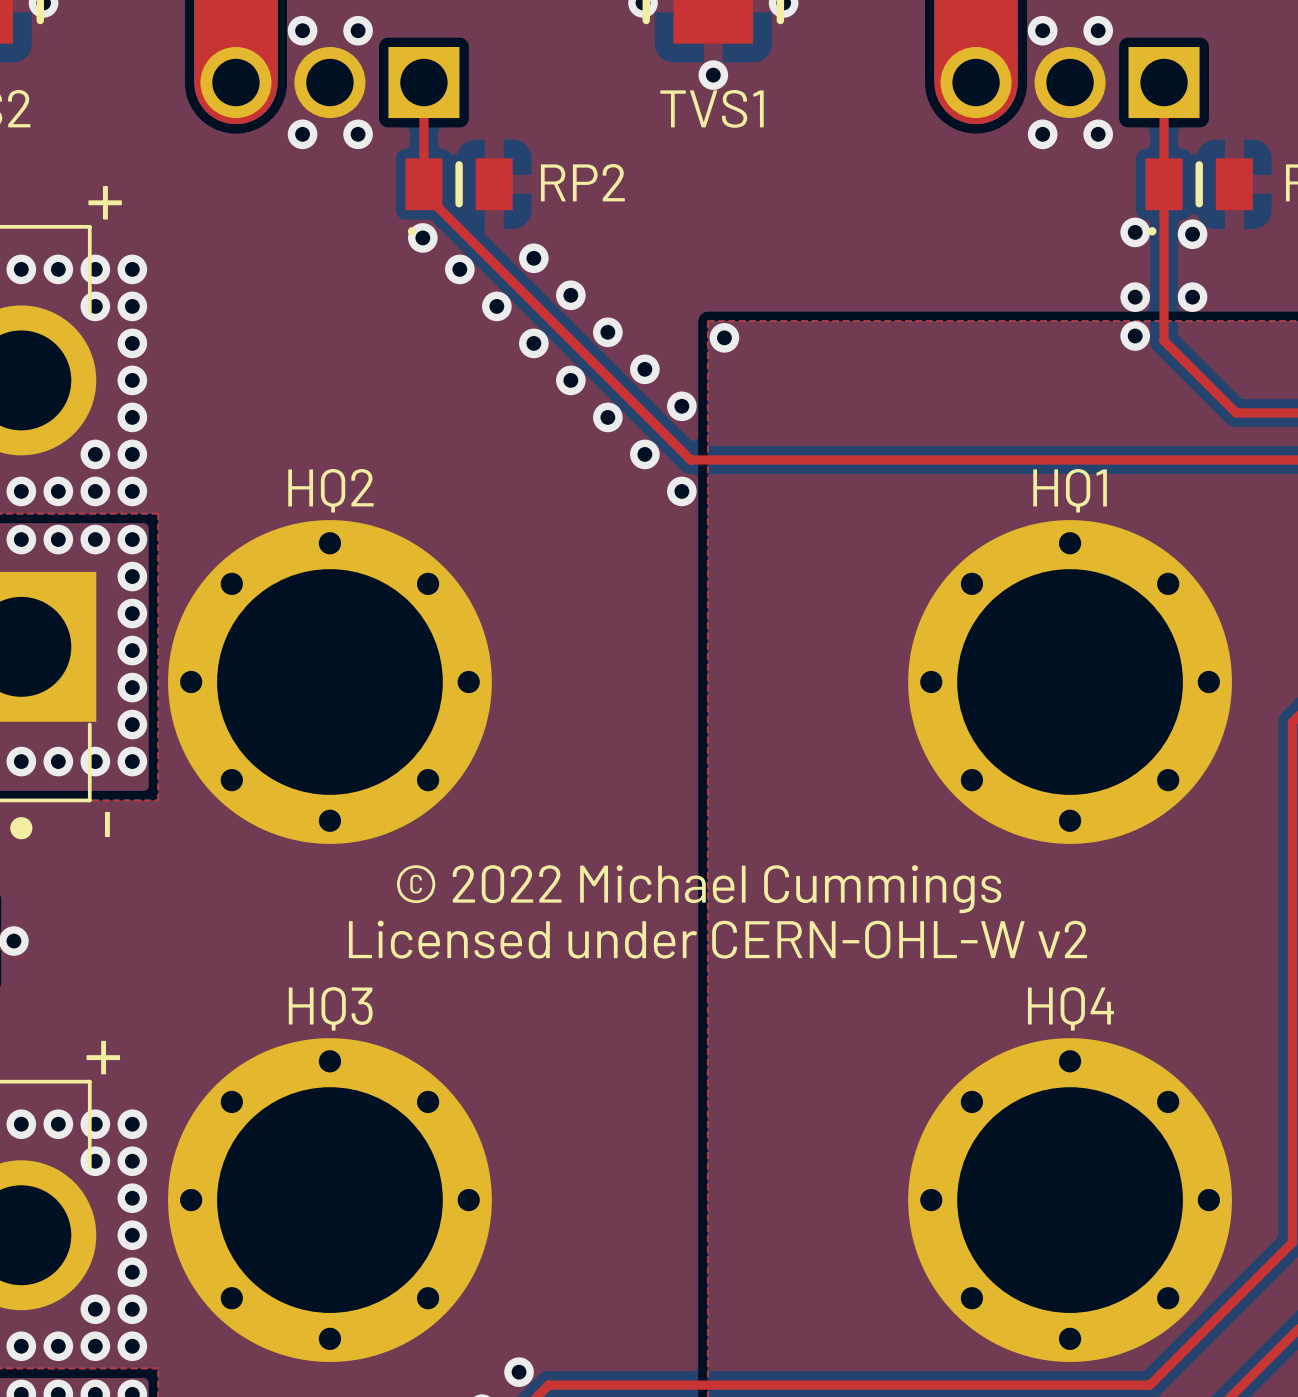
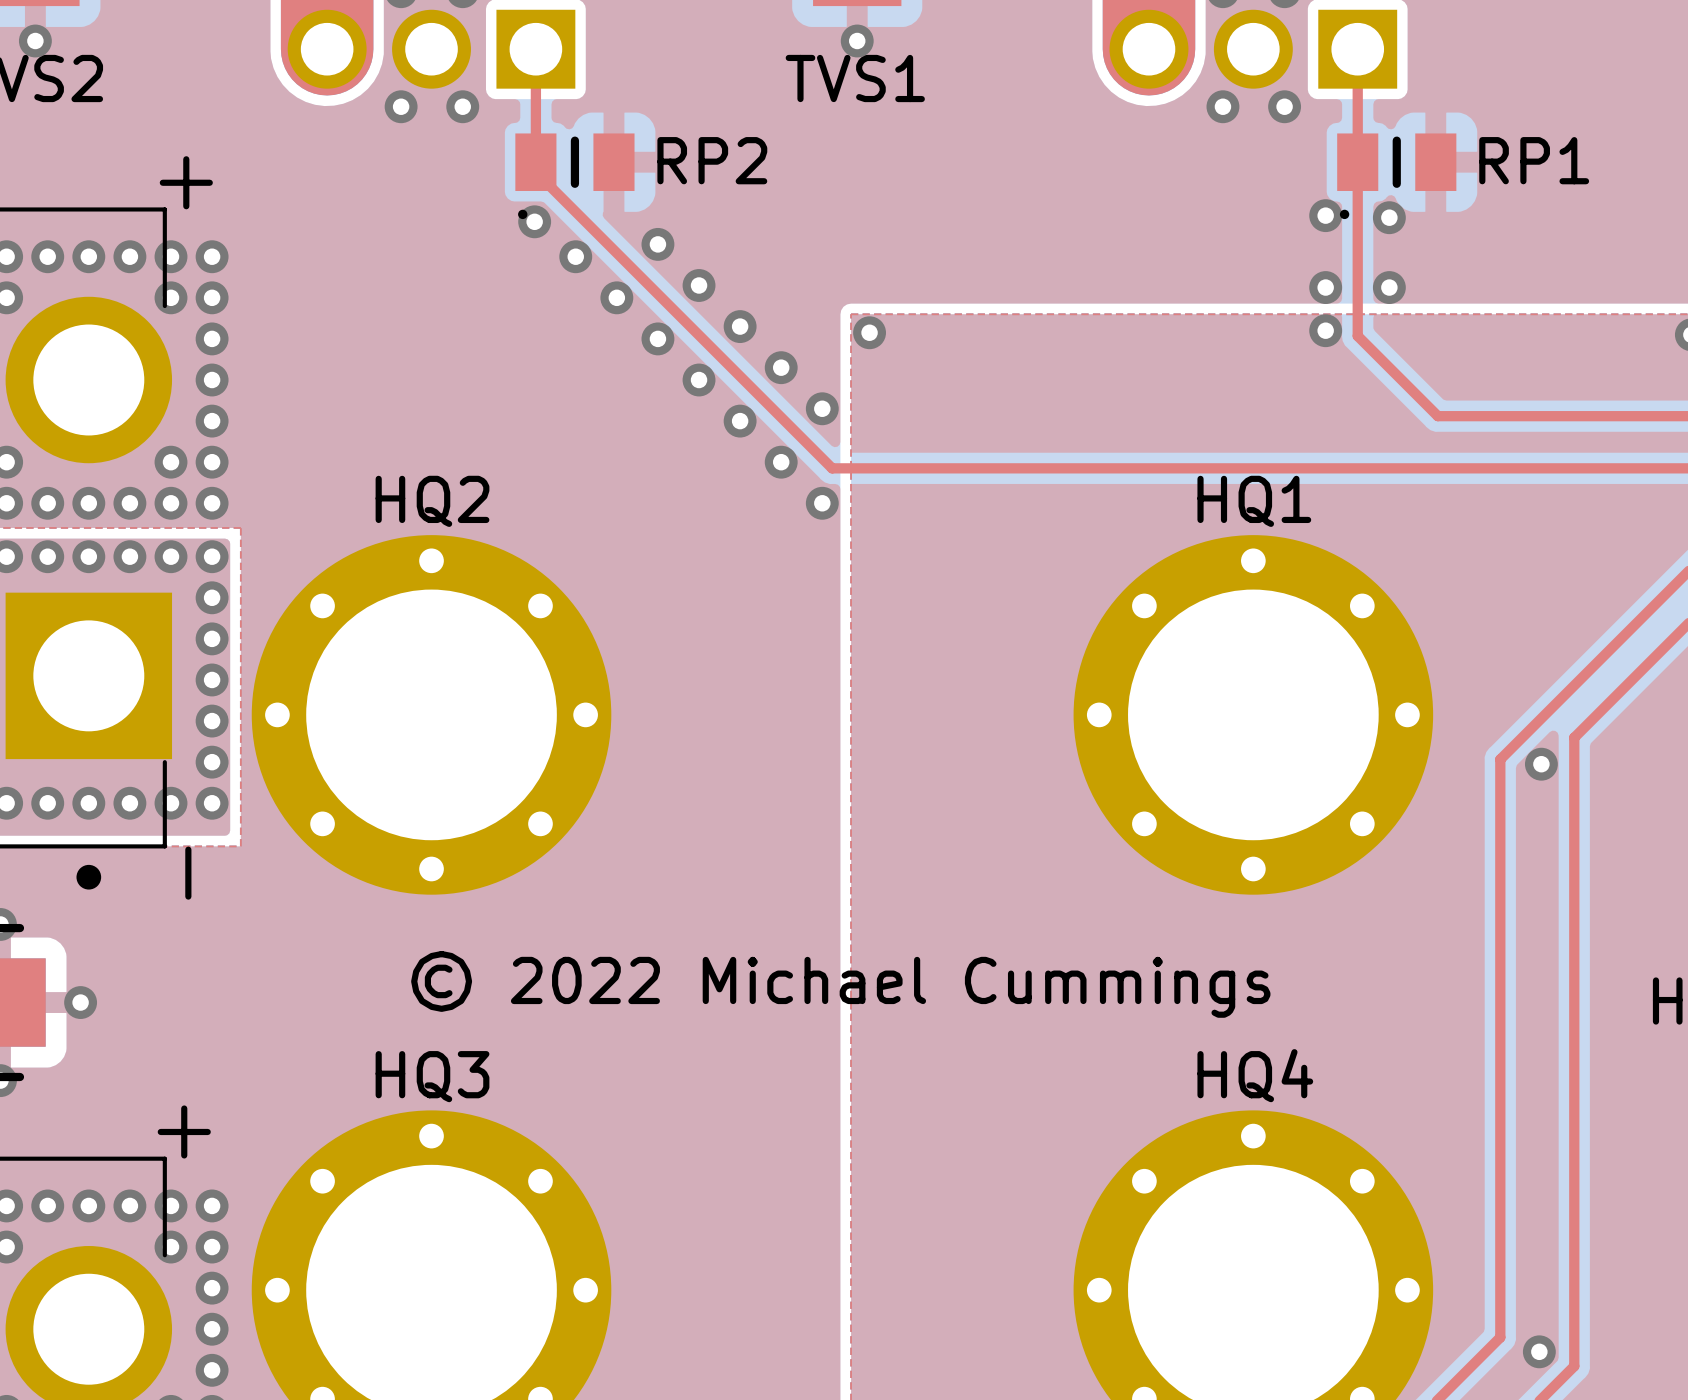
text position: © 2022 Michael Cummings (699, 889) -> © 2022 Michael Cummings (840, 984)
text: Licensed under CERN-OHL-W v2 (717, 939) -> none

